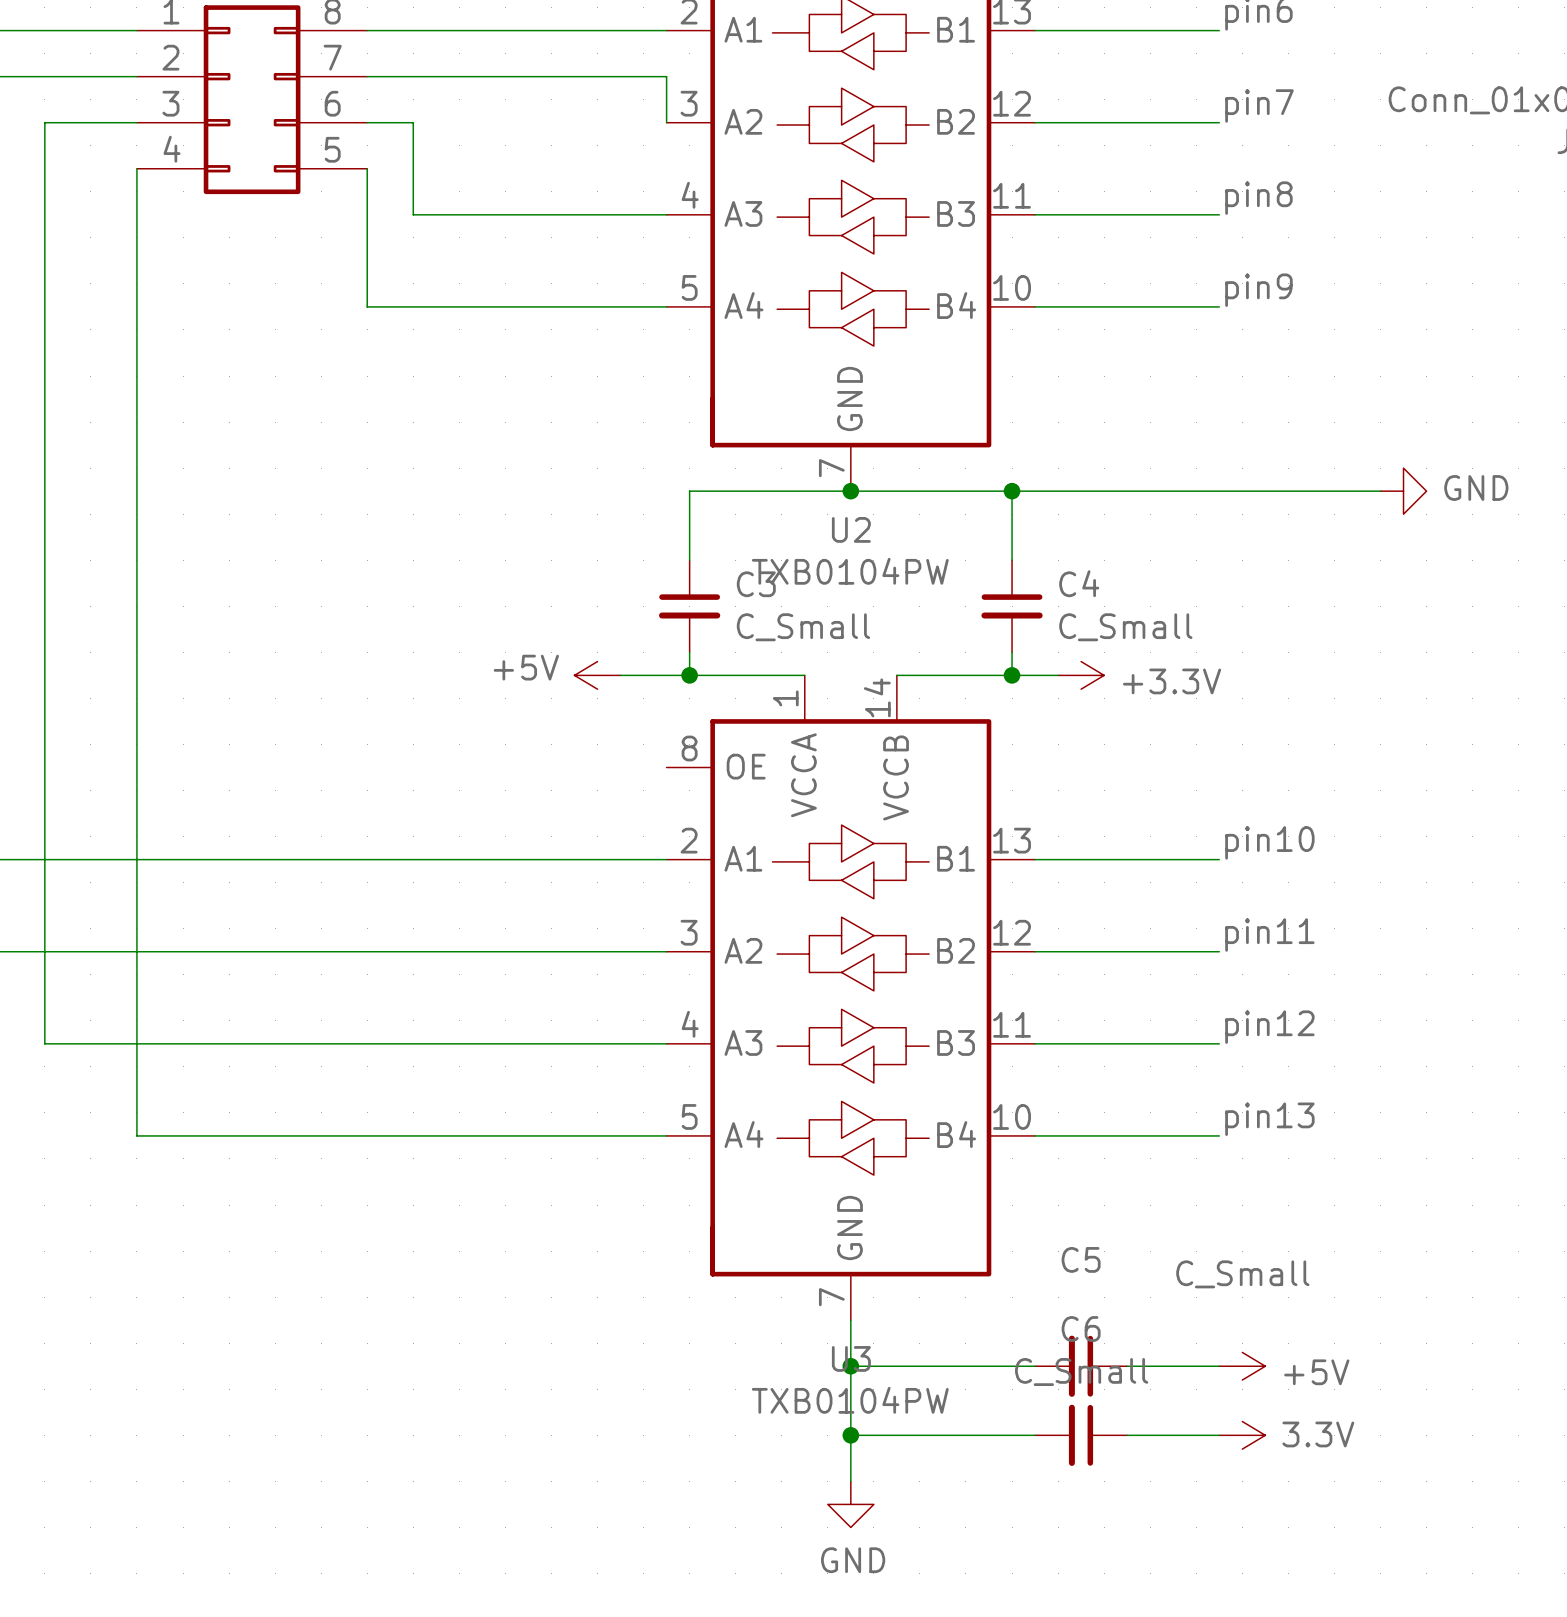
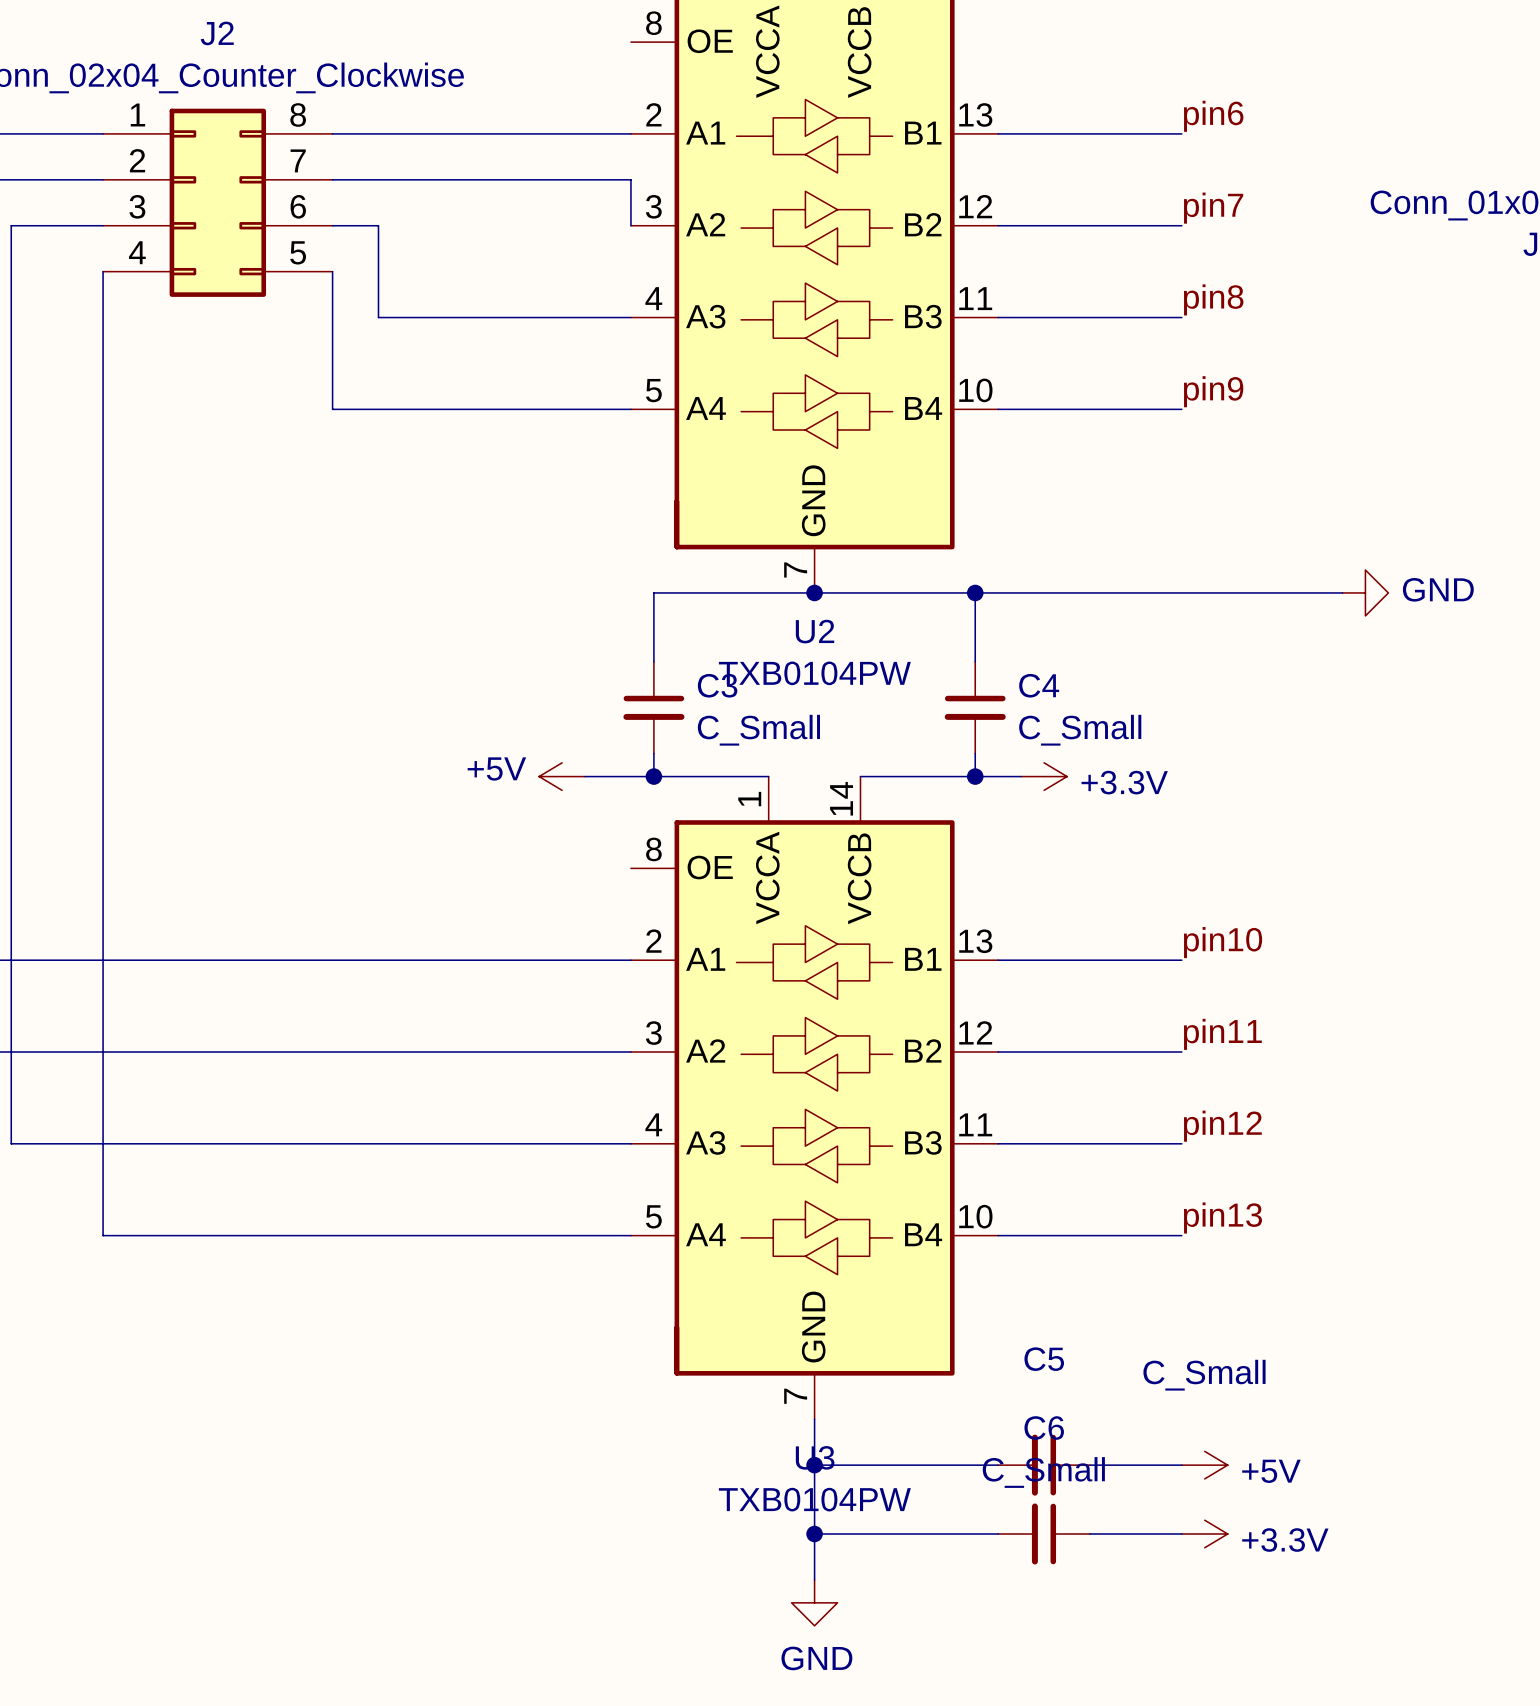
power symbol: 3.3V (1242, 1435) -> +3.3V (1204, 1533)

